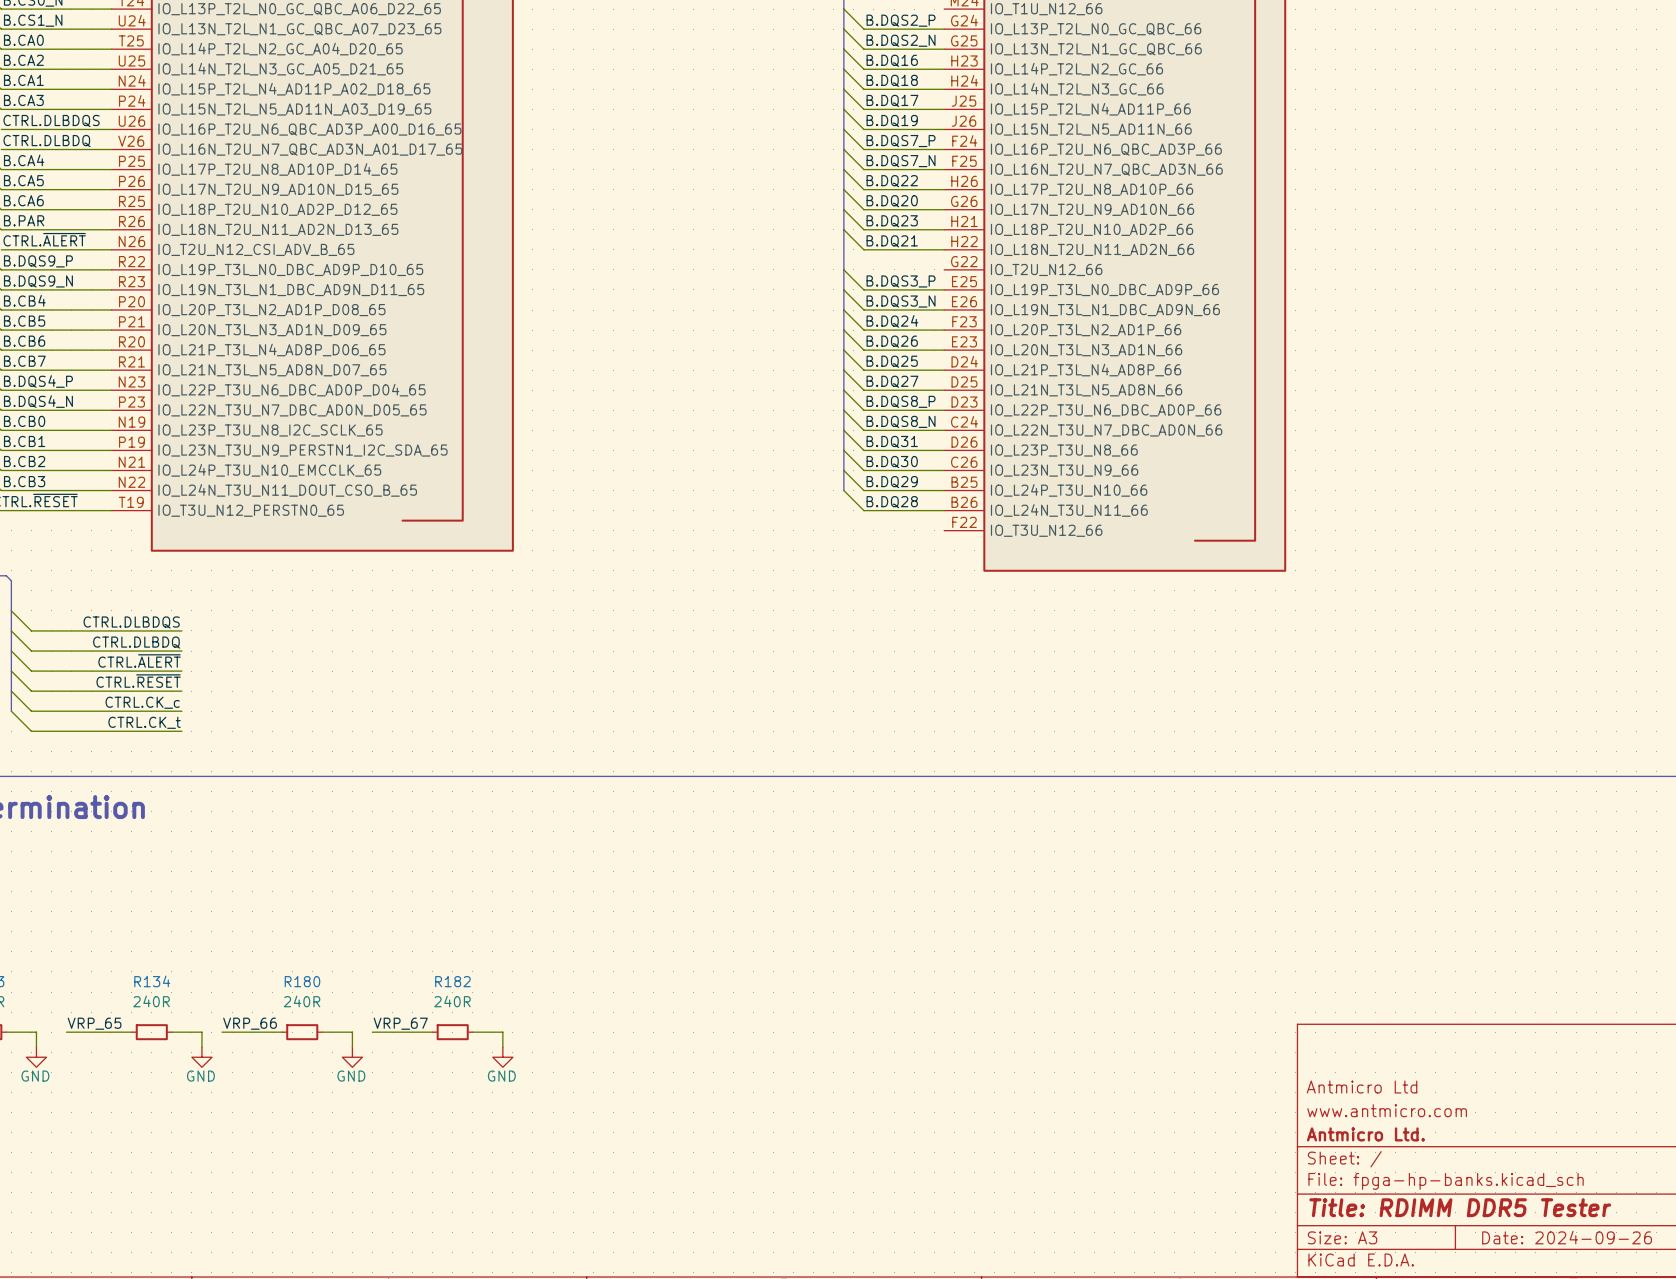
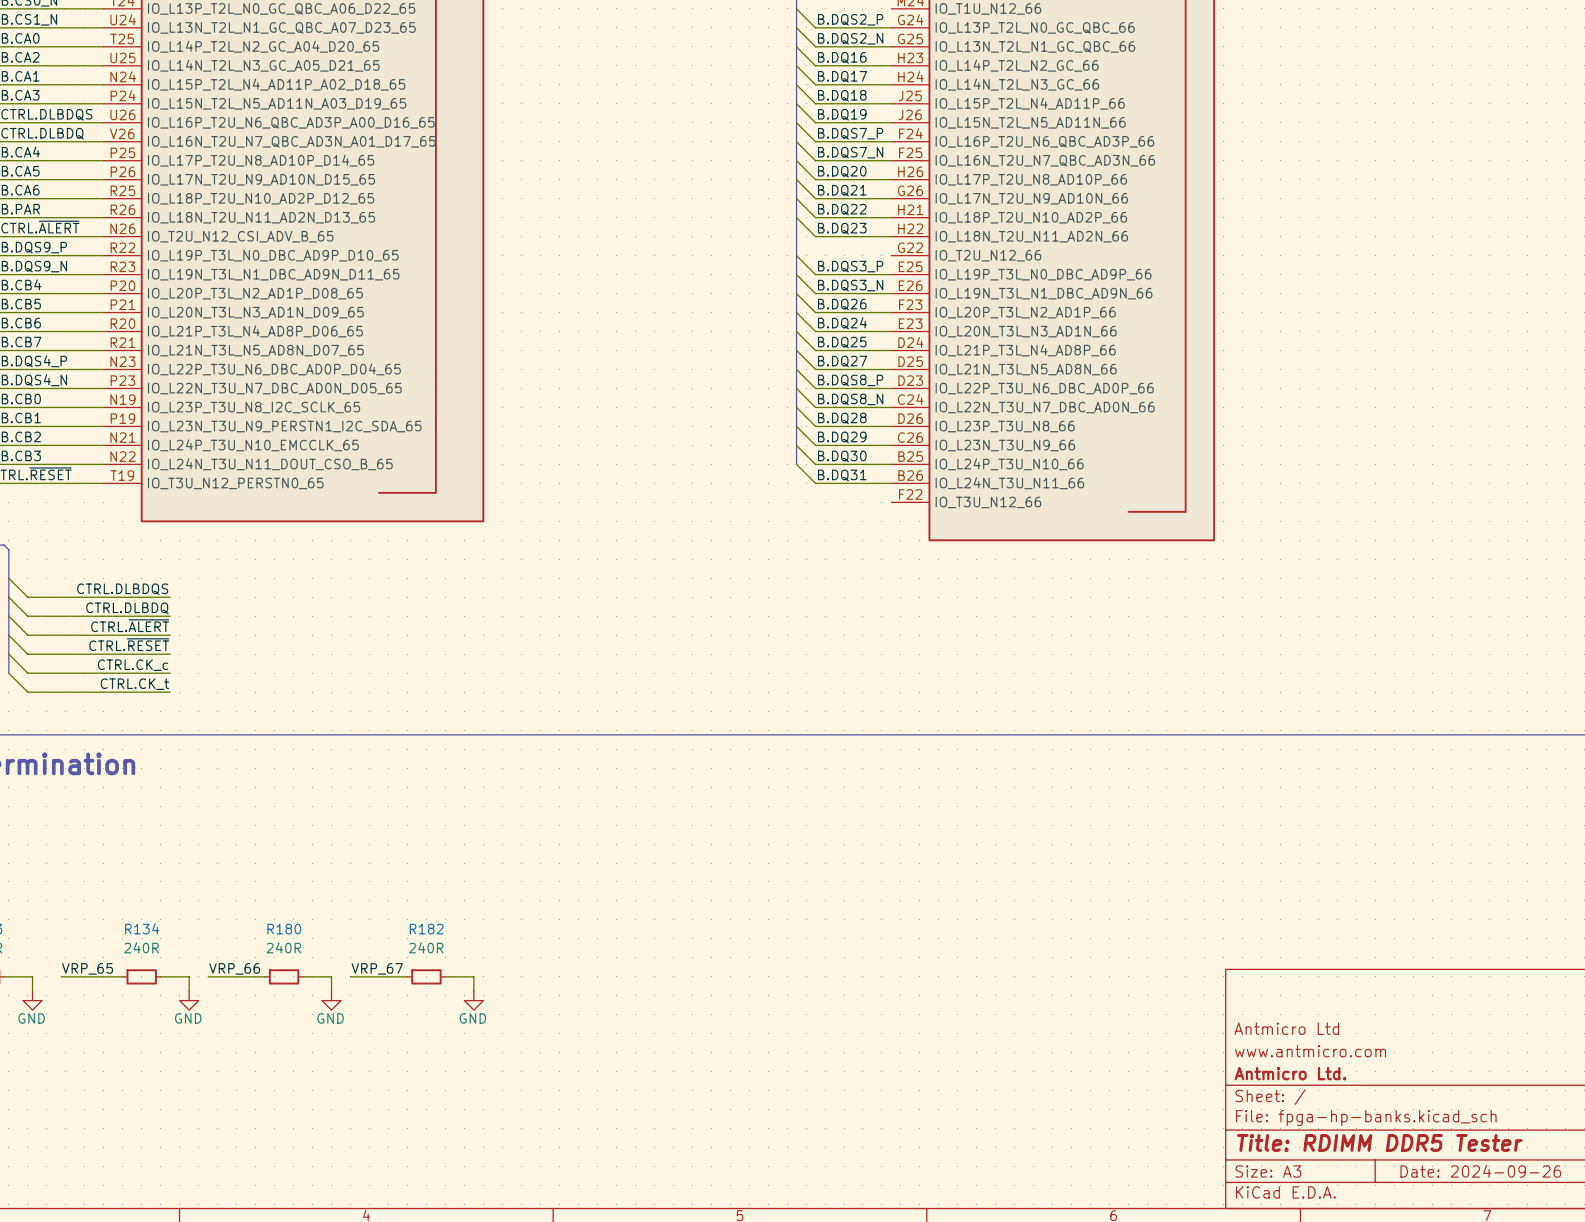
label: B.DQ18 (892, 80) -> B.DQ17 (842, 76)
label: B.DQ17 (892, 100) -> B.DQ18 (842, 95)
label: B.DQ22 (892, 181) -> B.DQ20 (842, 171)
label: B.DQ20 (892, 201) -> B.DQ21 (842, 190)
label: B.DQ23 (892, 221) -> B.DQ22 (842, 209)
label: B.DQ21 (892, 241) -> B.DQ23 (842, 228)
label: B.DQ24 (892, 321) -> B.DQ26 (842, 304)
label: B.DQ26 (892, 341) -> B.DQ24 (842, 323)
label: B.DQ31 (892, 441) -> B.DQ28 (842, 418)
label: B.DQ30 (892, 462) -> B.DQ29 (842, 437)
label: B.DQ29 (892, 482) -> B.DQ30 (842, 456)
label: B.DQ28 (892, 502) -> B.DQ31 (842, 475)

